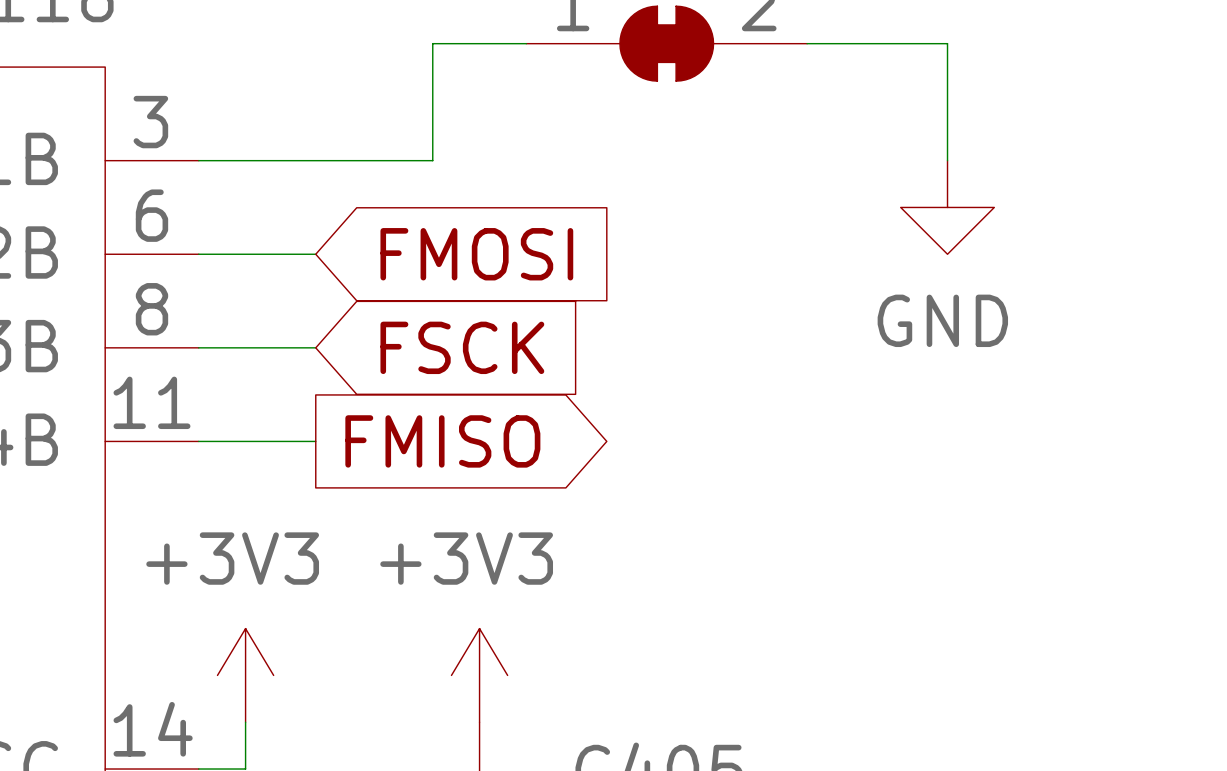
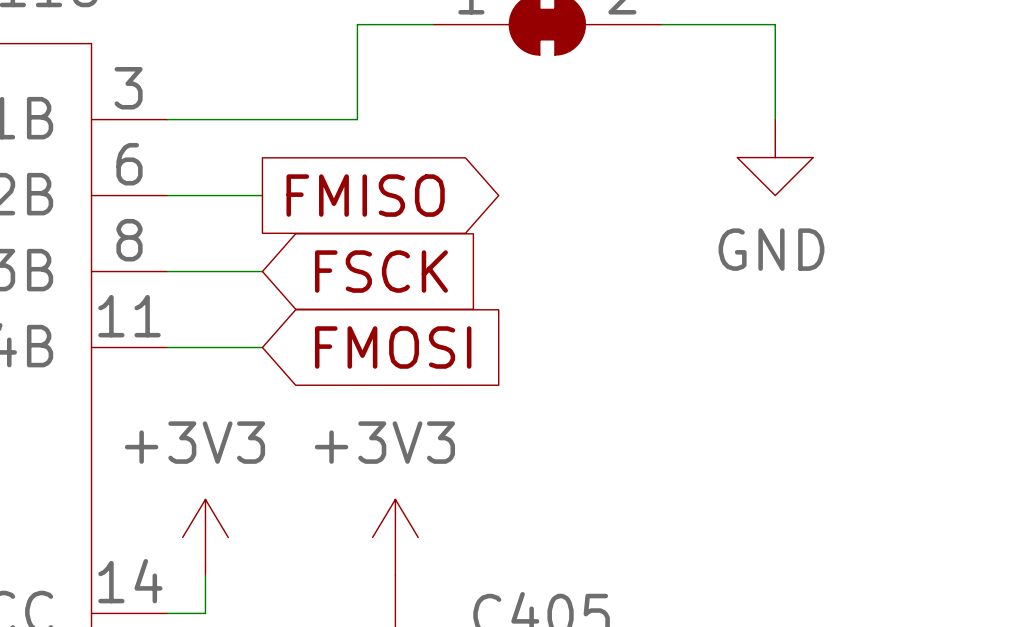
global label shape: input (476, 254) -> output (365, 195)
global label: FMOSI (476, 254) -> FMISO (365, 195)
global label shape: output (442, 441) -> input (393, 347)
global label: FMISO (442, 441) -> FMOSI (393, 347)

